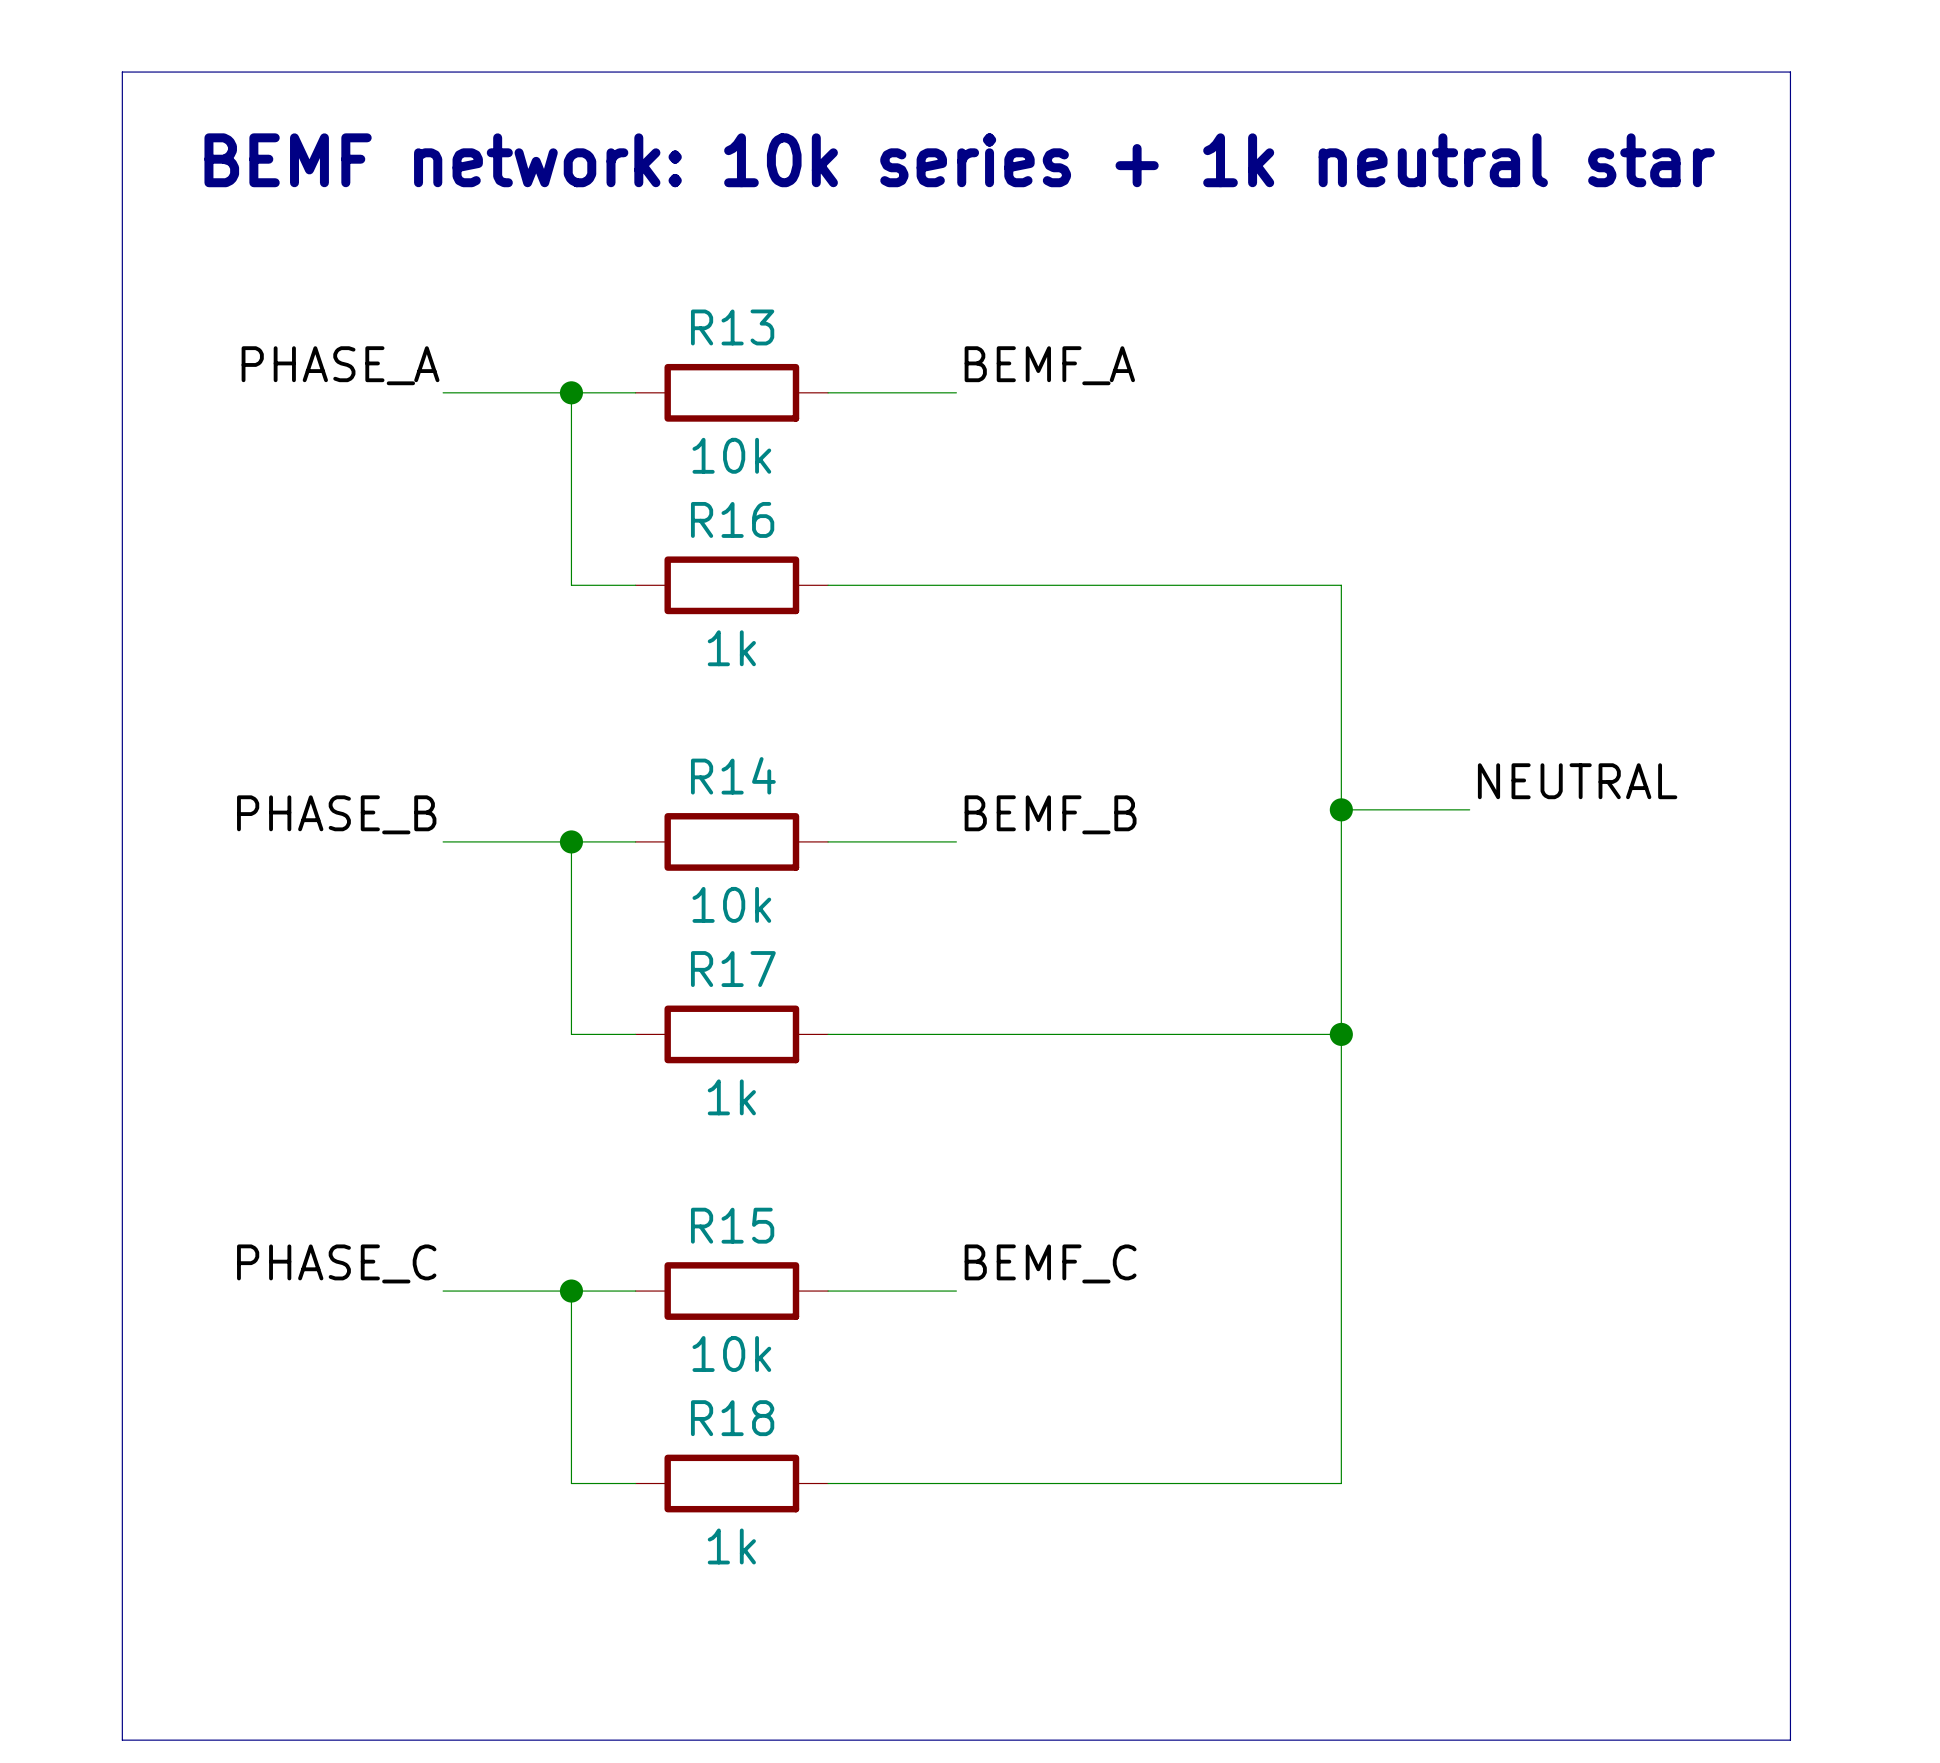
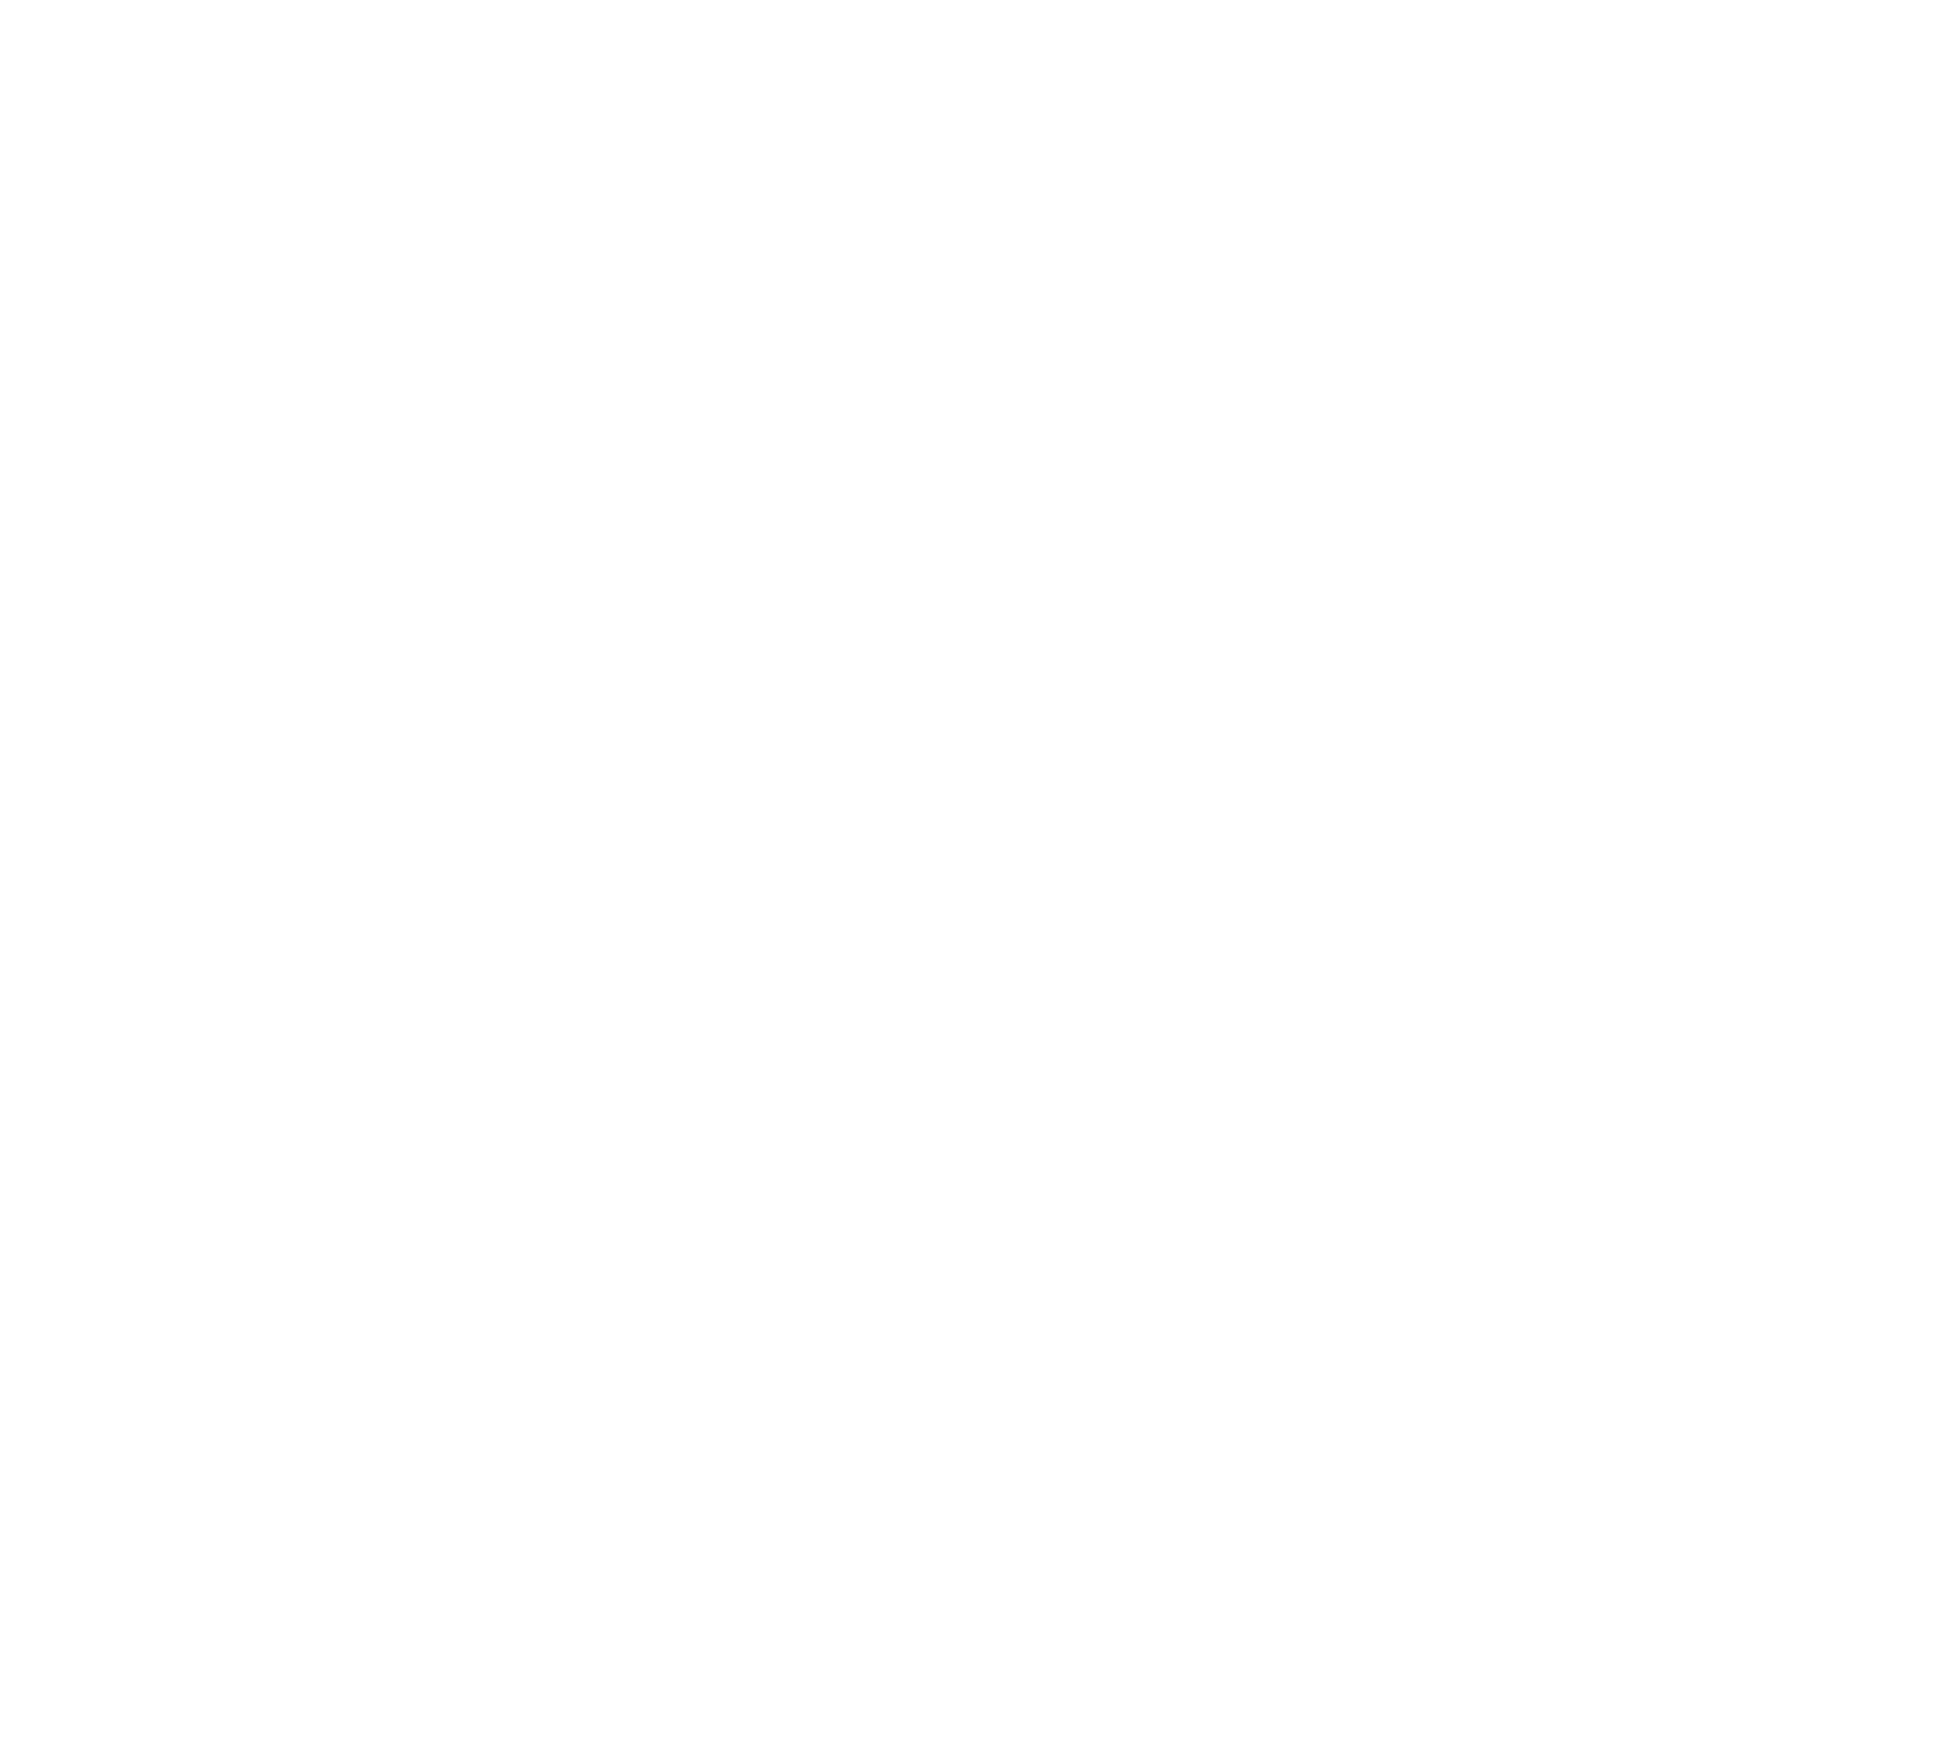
line: (122, 72) (1790, 72) (1790, 1740) (122, 1740) (122, 72) -> none
text: BEMF network: 10k series + 1k neutral star (959, 160) -> none
label: PHASE_A (340, 365) -> none
label: BEMF_A (1049, 365) -> none
wire: (443, 392) (635, 392) -> none
wire: (571, 392) (571, 585) (635, 585) -> none
junction: (571, 392) -> none
R13: 10k (731, 392) -> none
wire: (828, 392) (956, 392) -> none
R16: 1k (731, 585) -> none
wire: (828, 585) (1341, 585) (1341, 1483) (828, 1483) -> none
label: NEUTRAL (1577, 781) -> none
wire: (1341, 809) (1469, 809) -> none
junction: (1341, 809) -> none
label: PHASE_B (336, 814) -> none
label: BEMF_B (1050, 814) -> none
wire: (443, 841) (635, 841) -> none
wire: (571, 841) (571, 1034) (635, 1034) -> none
junction: (571, 841) -> none
R14: 10k (731, 841) -> none
wire: (828, 841) (956, 841) -> none
R17: 1k (731, 1034) -> none
wire: (828, 1034) (1341, 1034) -> none
junction: (1341, 1034) -> none
label: PHASE_C (336, 1263) -> none
label: BEMF_C (1050, 1263) -> none
wire: (443, 1291) (635, 1291) -> none
wire: (571, 1291) (571, 1483) (635, 1483) -> none
junction: (571, 1291) -> none
R15: 10k (731, 1291) -> none
wire: (828, 1291) (956, 1291) -> none
R18: 1k (731, 1483) -> none

